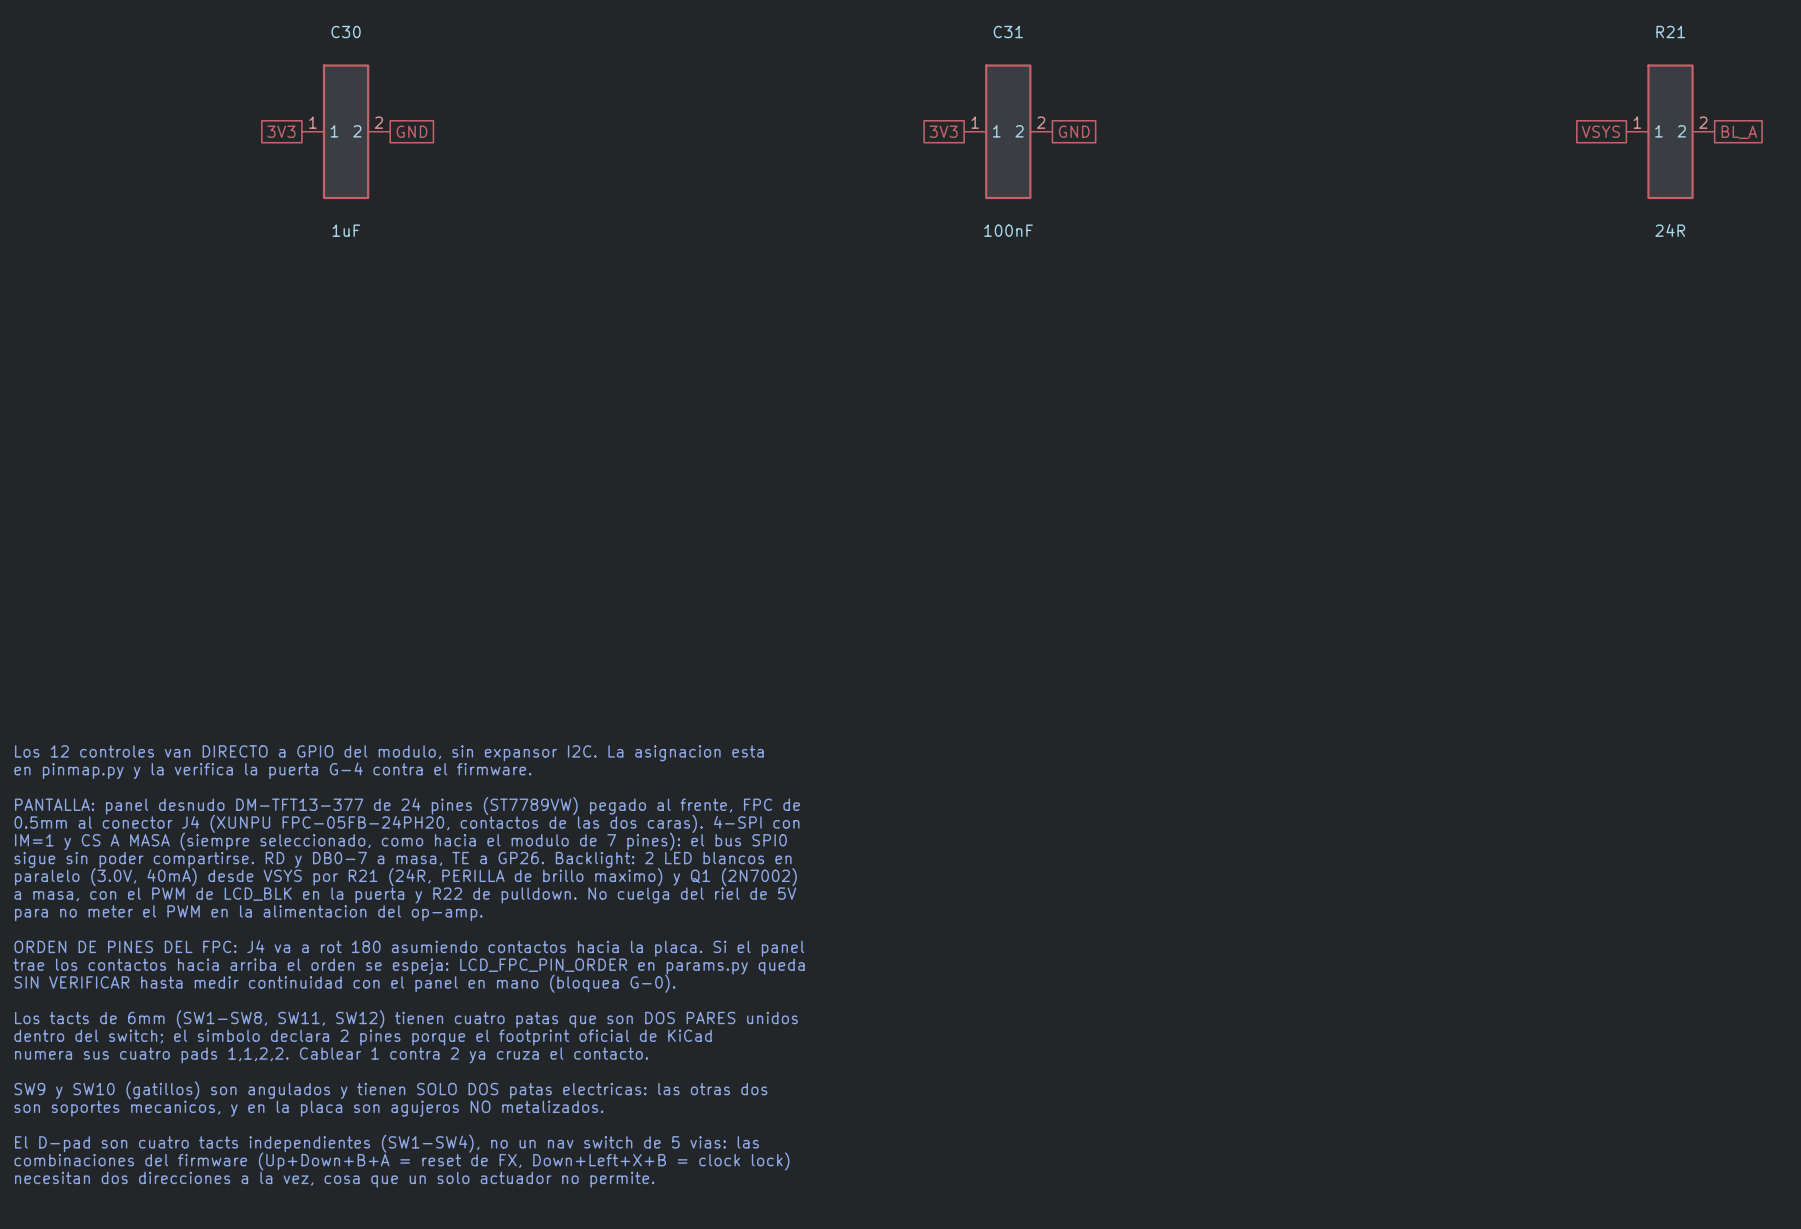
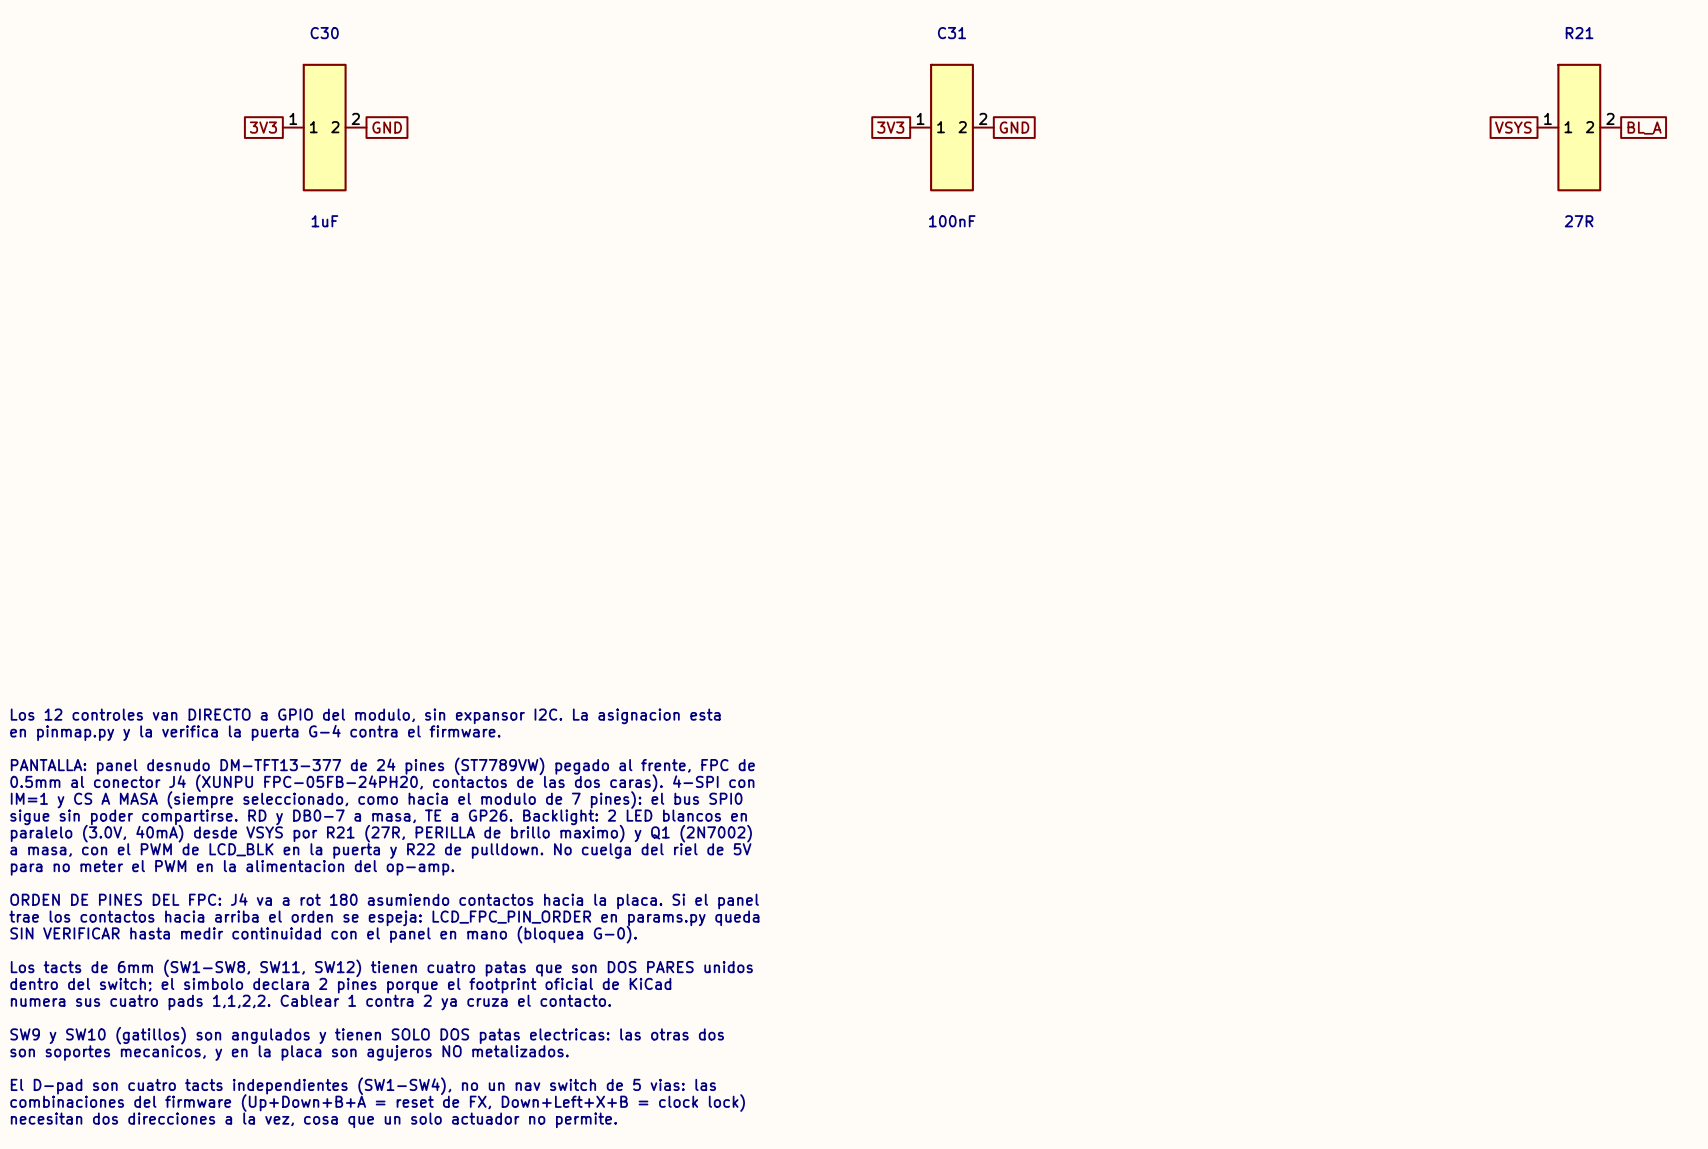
R21 value: 24R (1670, 230) -> 27R (1579, 221)
text: paralelo (3.0V, 40mA) desde VSYS por R21 (24R, PERILLA de brillo maximo) y Q1 (2N7002) (405, 877) -> paralelo (3.0V, 40mA) desde VSYS por R21 (27R, PERILLA de brillo maximo) y Q1 (2N7002) (381, 833)

